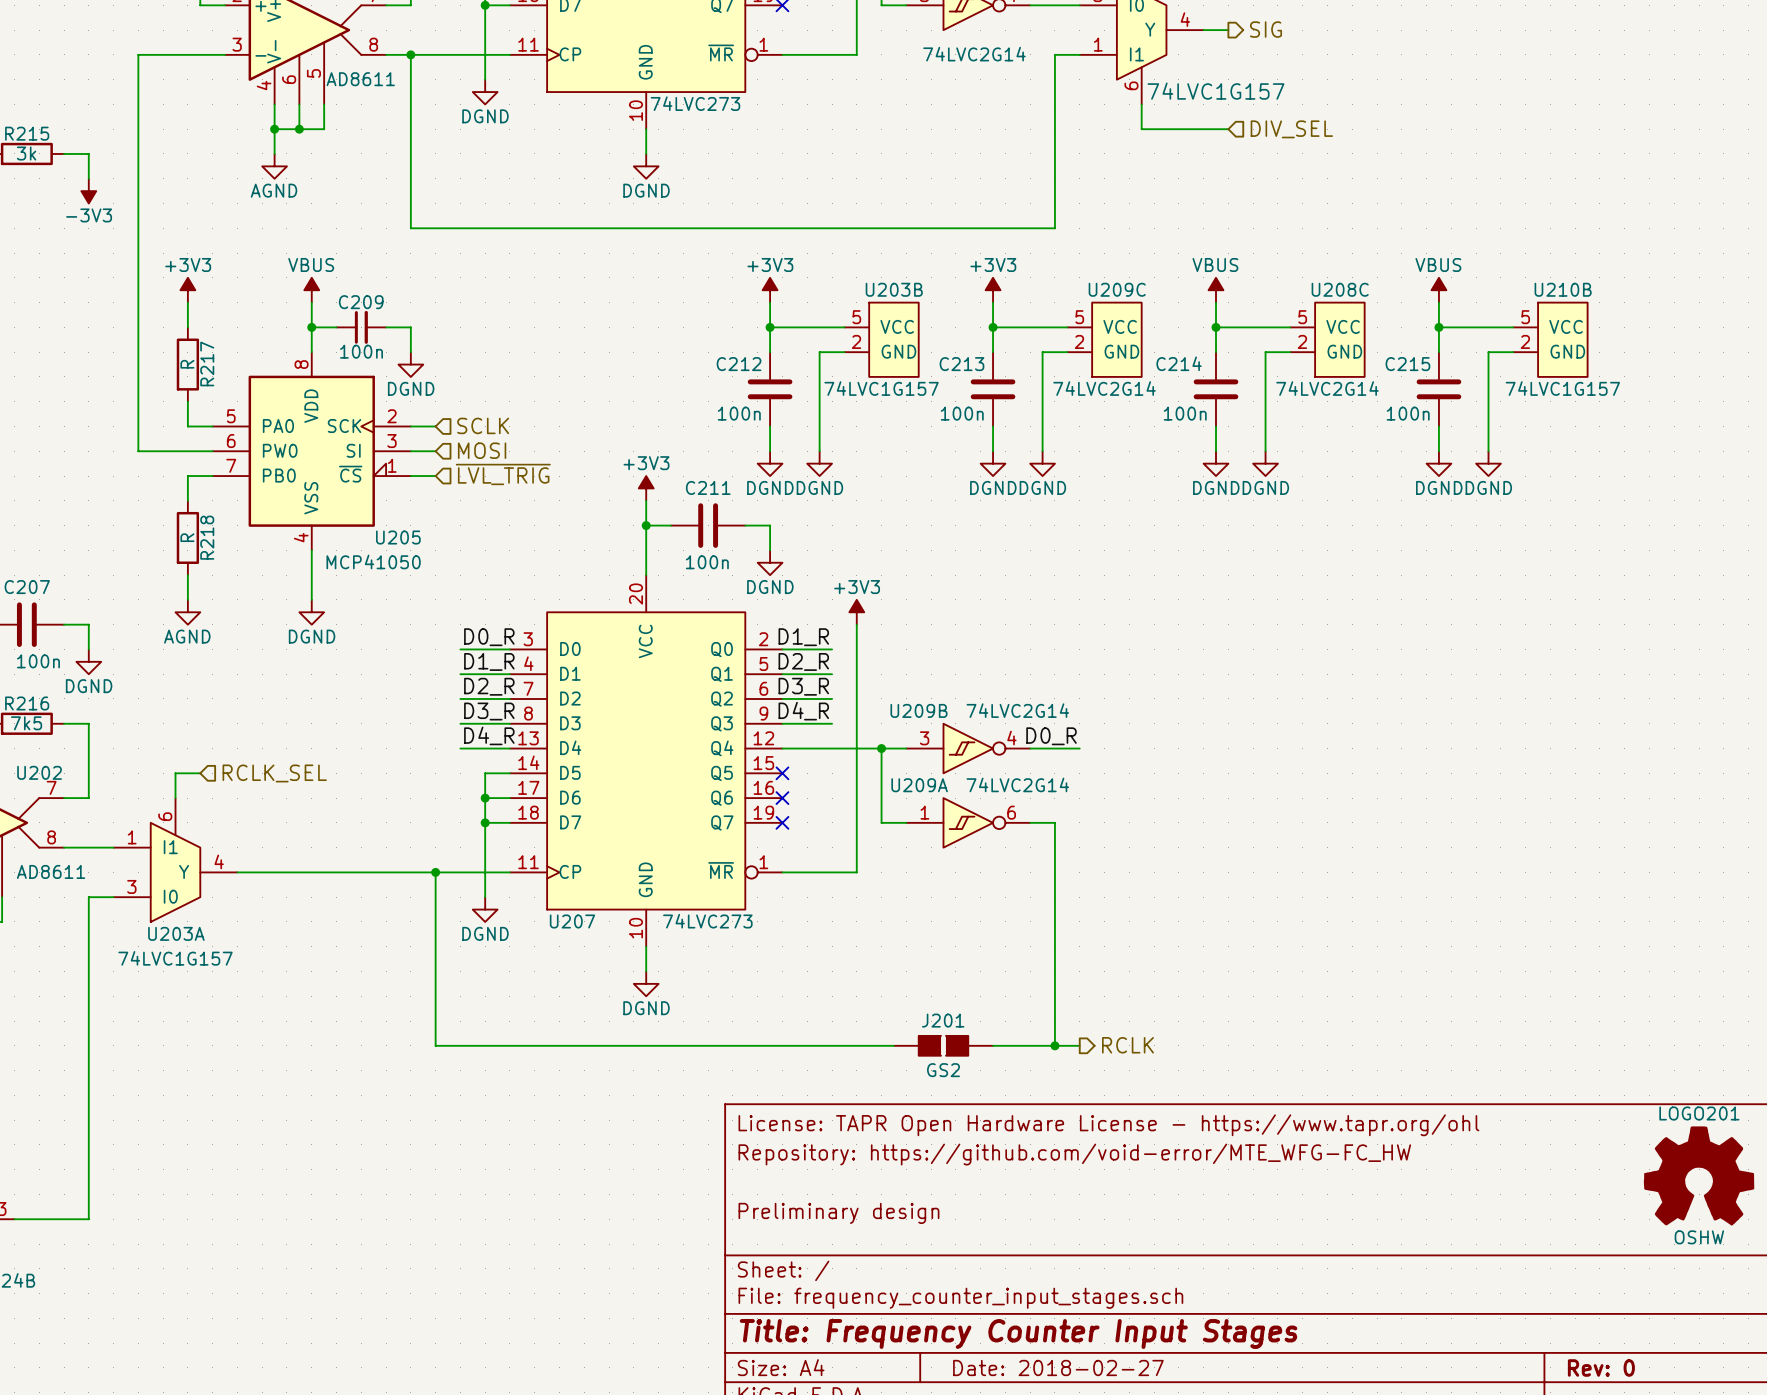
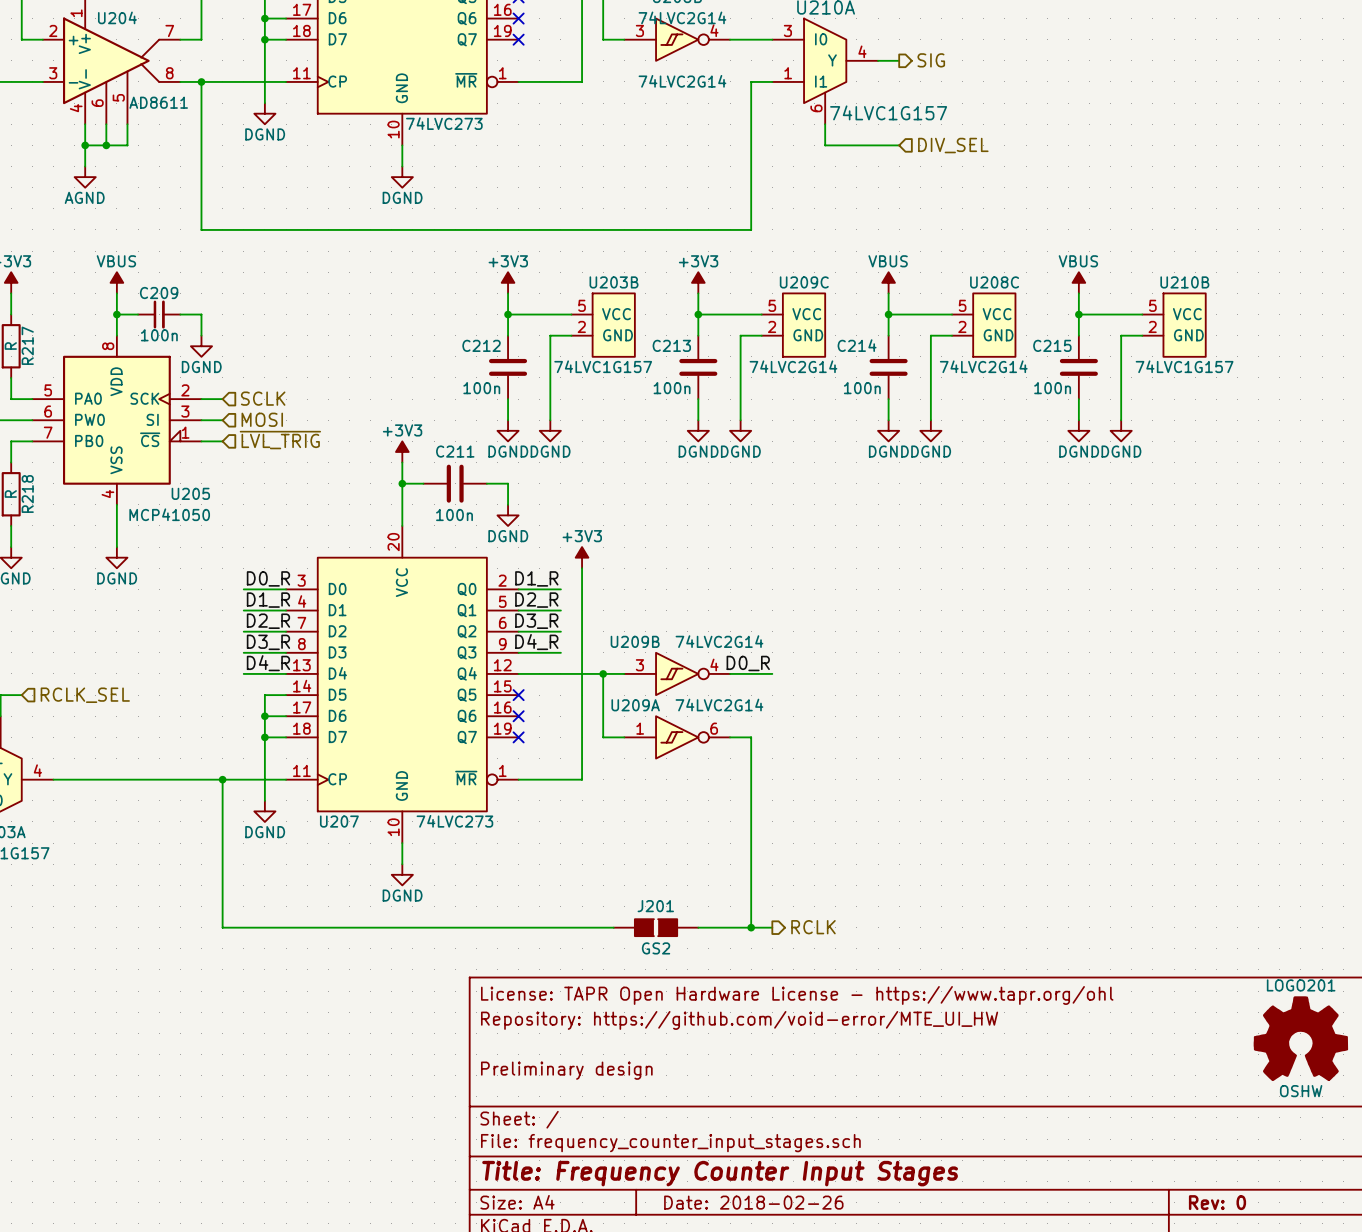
title block: Repository: https://github.com/void-error/MTE_WFG-FC_HW (1074, 1154) -> Repository: https://github.com/void-error/MTE_UI_HW (739, 1020)
title block: Date: 2018-02-27 (1058, 1367) -> Date: 2018-02-26 (753, 1202)

